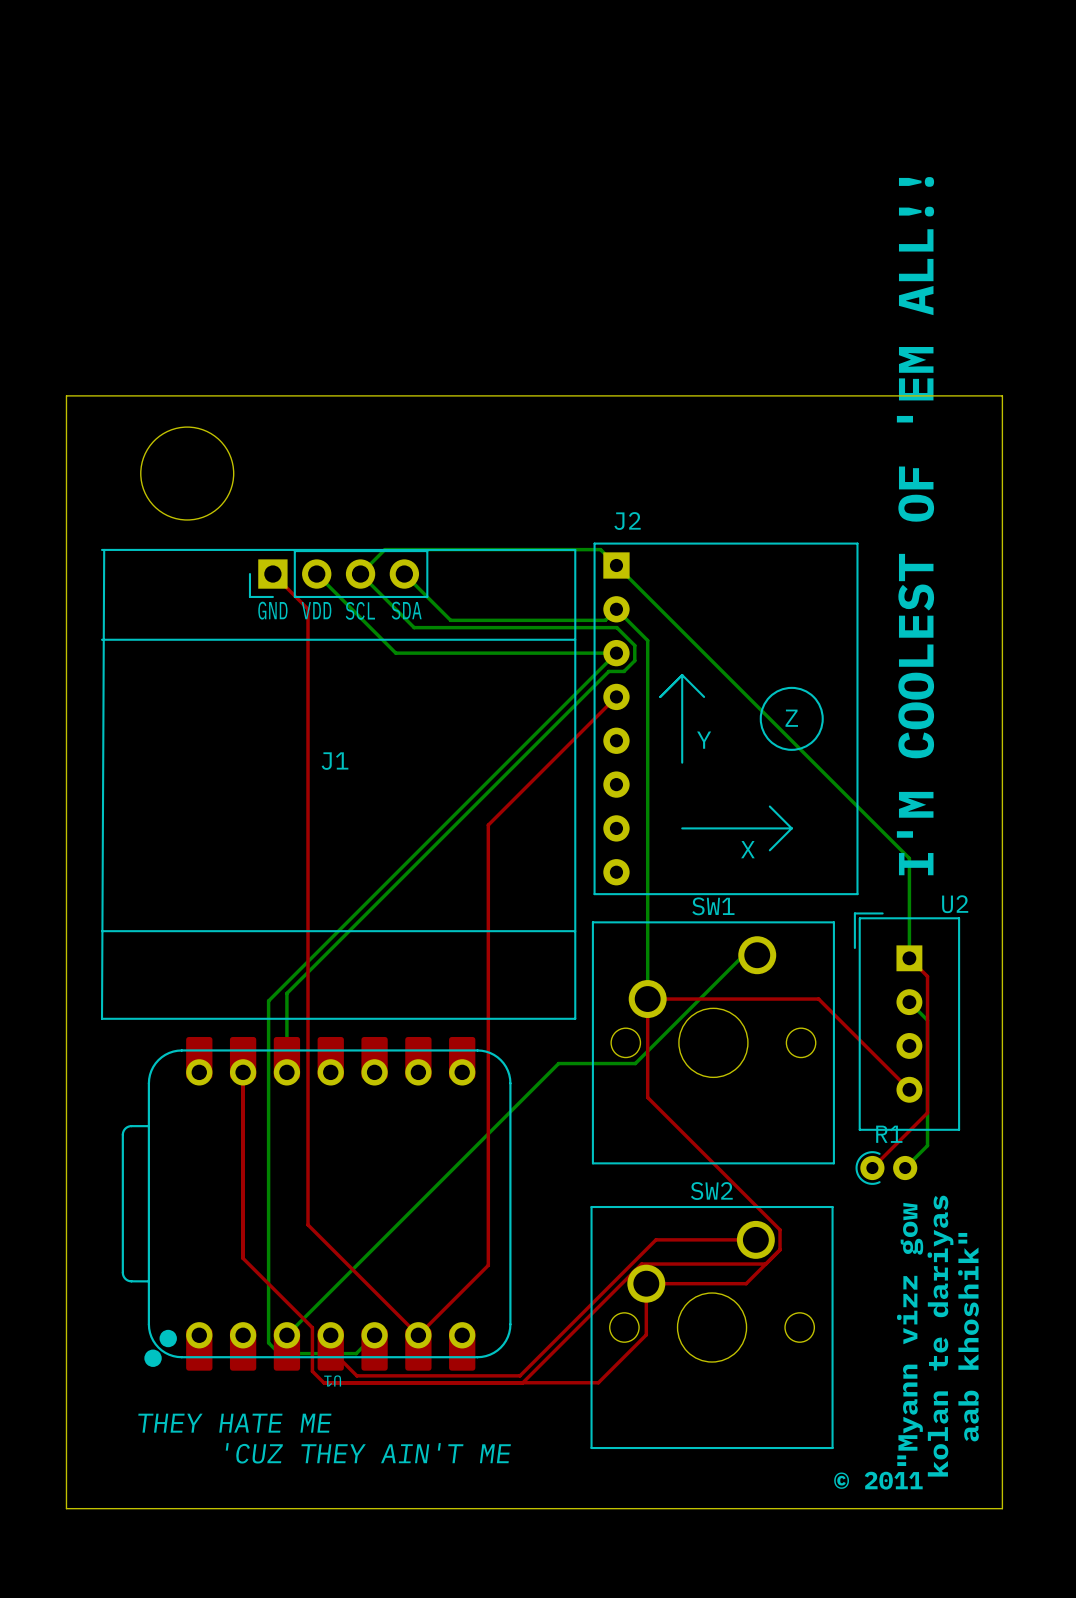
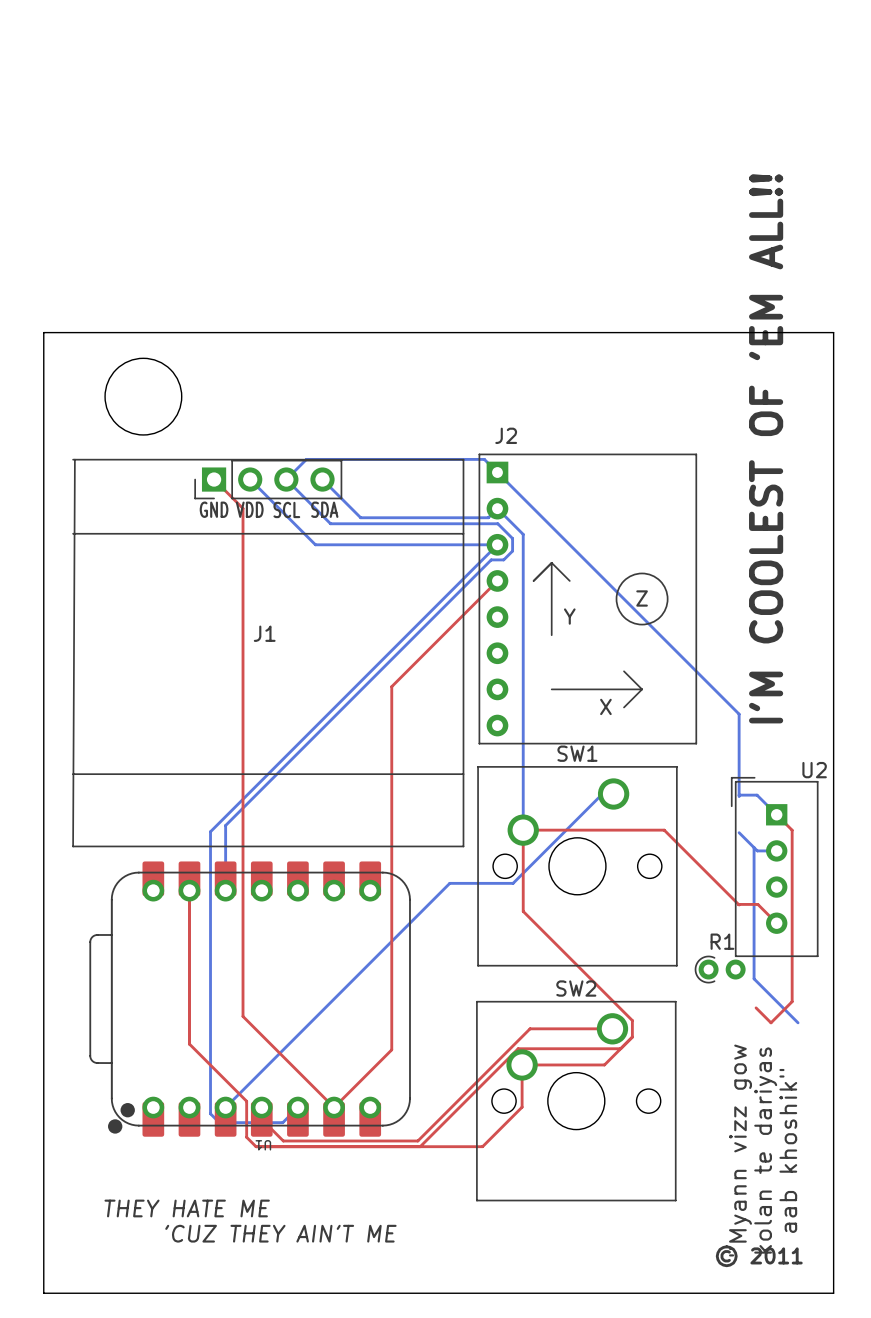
board edge: (1002, 395) (1002, 1508) (66, 1508) -> (815, 332) (833, 332) (833, 1293) (43, 1293) (43, 1250)
text position: I'M COOLEST OF 'EM ALL!! (915, 526) -> I'M COOLEST OF 'EM ALL!! (766, 448)
bottom track: none -> (739, 795) (757, 795) (776, 814)
top track: (909, 958) (927, 976) (927, 1112) (872, 1168) -> none
top track: none -> (776, 814) (792, 830) (792, 1001) (771, 1022) (756, 1007)
bottom track: none -> (754, 847) (757, 850) (776, 850)
U2 position: (906, 1021) -> (774, 867)
top track: none -> (738, 904) (757, 904) (776, 923)
bottom track: (927, 1145) (905, 1168) -> (754, 951) (754, 978) (798, 1022)
text position: "Myann vizz gow (910, 1334) -> "Myann vizz gow (740, 1150)
text position: kolan te dariyas (940, 1336) -> kolan te dariyas (765, 1150)
text position: aab khoshik" (968, 1337) -> aab khoshik" (788, 1150)
text position: THEY HATE ME (234, 1423) -> THEY HATE ME (187, 1208)
text position: 'CUZ THEY AIN'T ME (368, 1453) -> 'CUZ THEY AIN'T ME (280, 1233)
text position: © 2011 (878, 1480) -> © 2011 (759, 1256)

